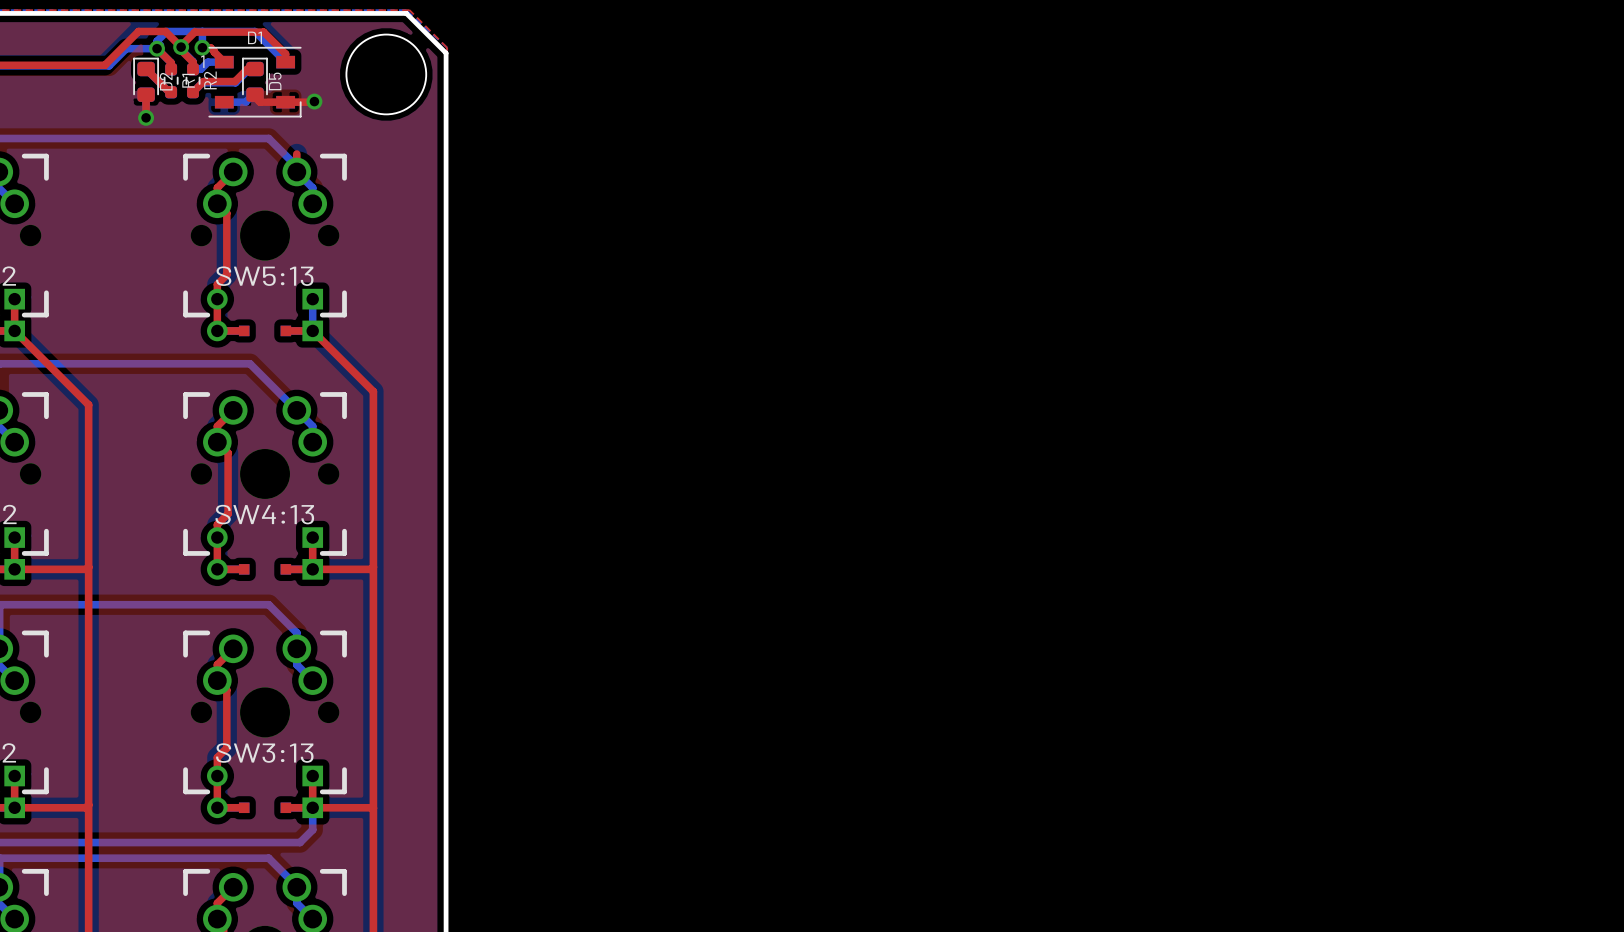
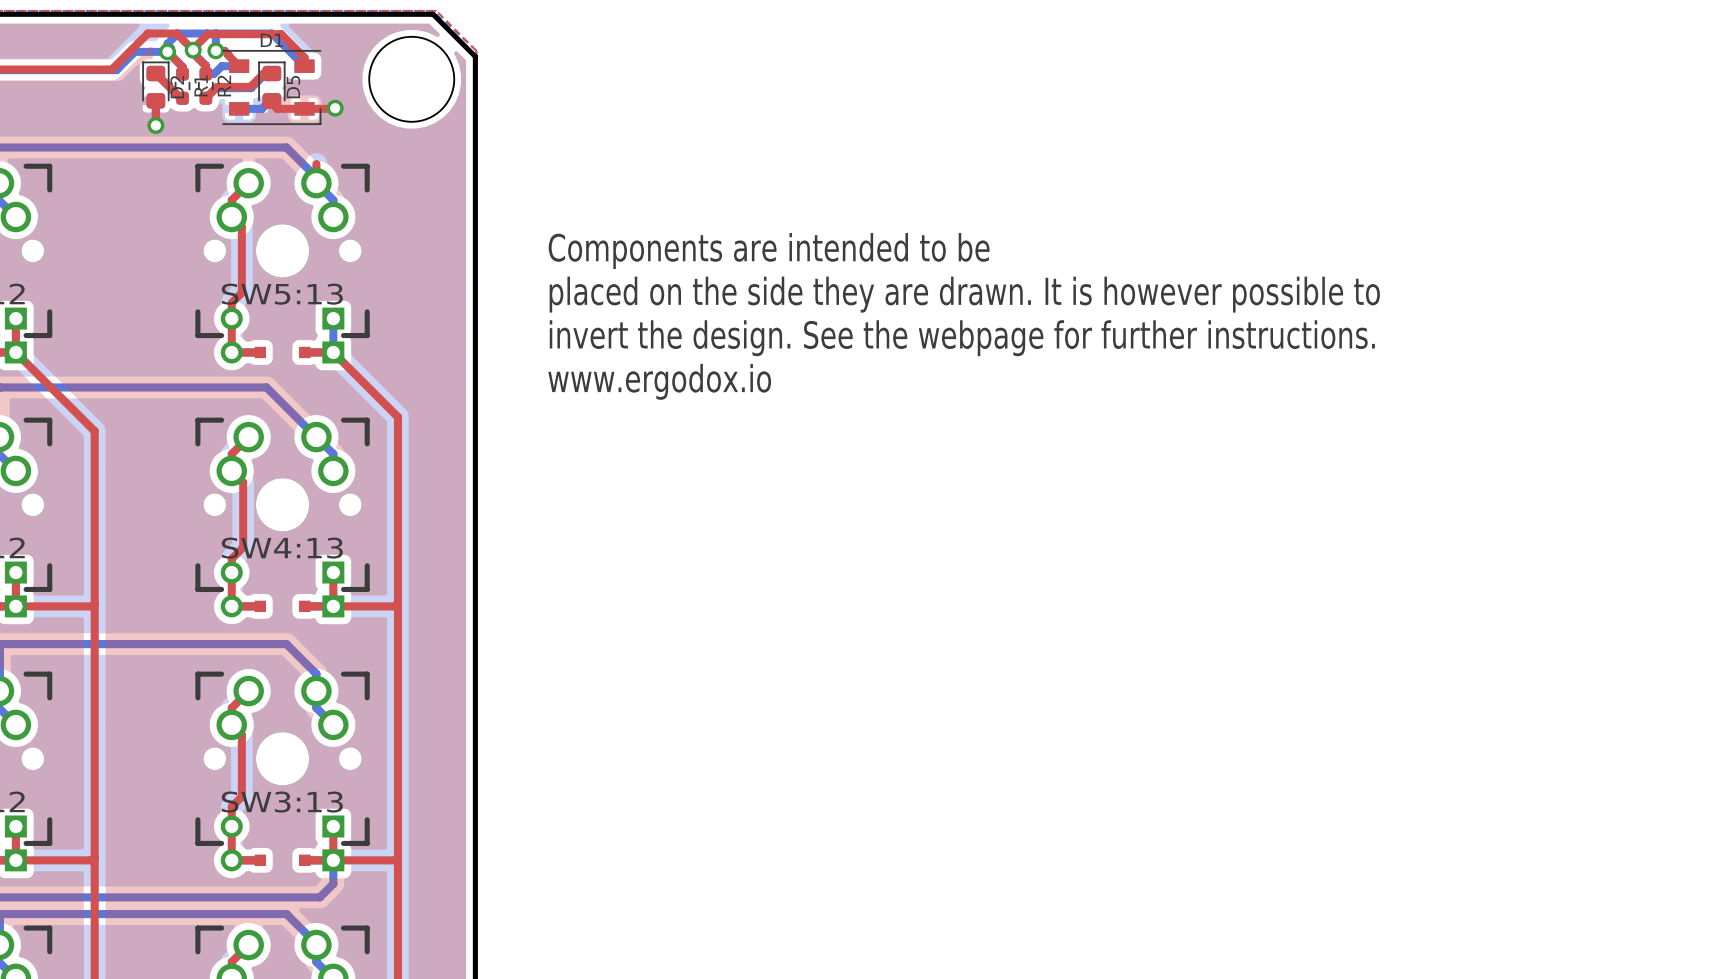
D1 text: 1 (202, 61) -> none
text: none -> Components are intended to be (769, 251)
text: none -> placed on the side they are drawn. It is however possible to (964, 294)
text: none -> invert the design. See the webpage for further instructions. (962, 338)
text: none -> www.ergodox.io (659, 381)

